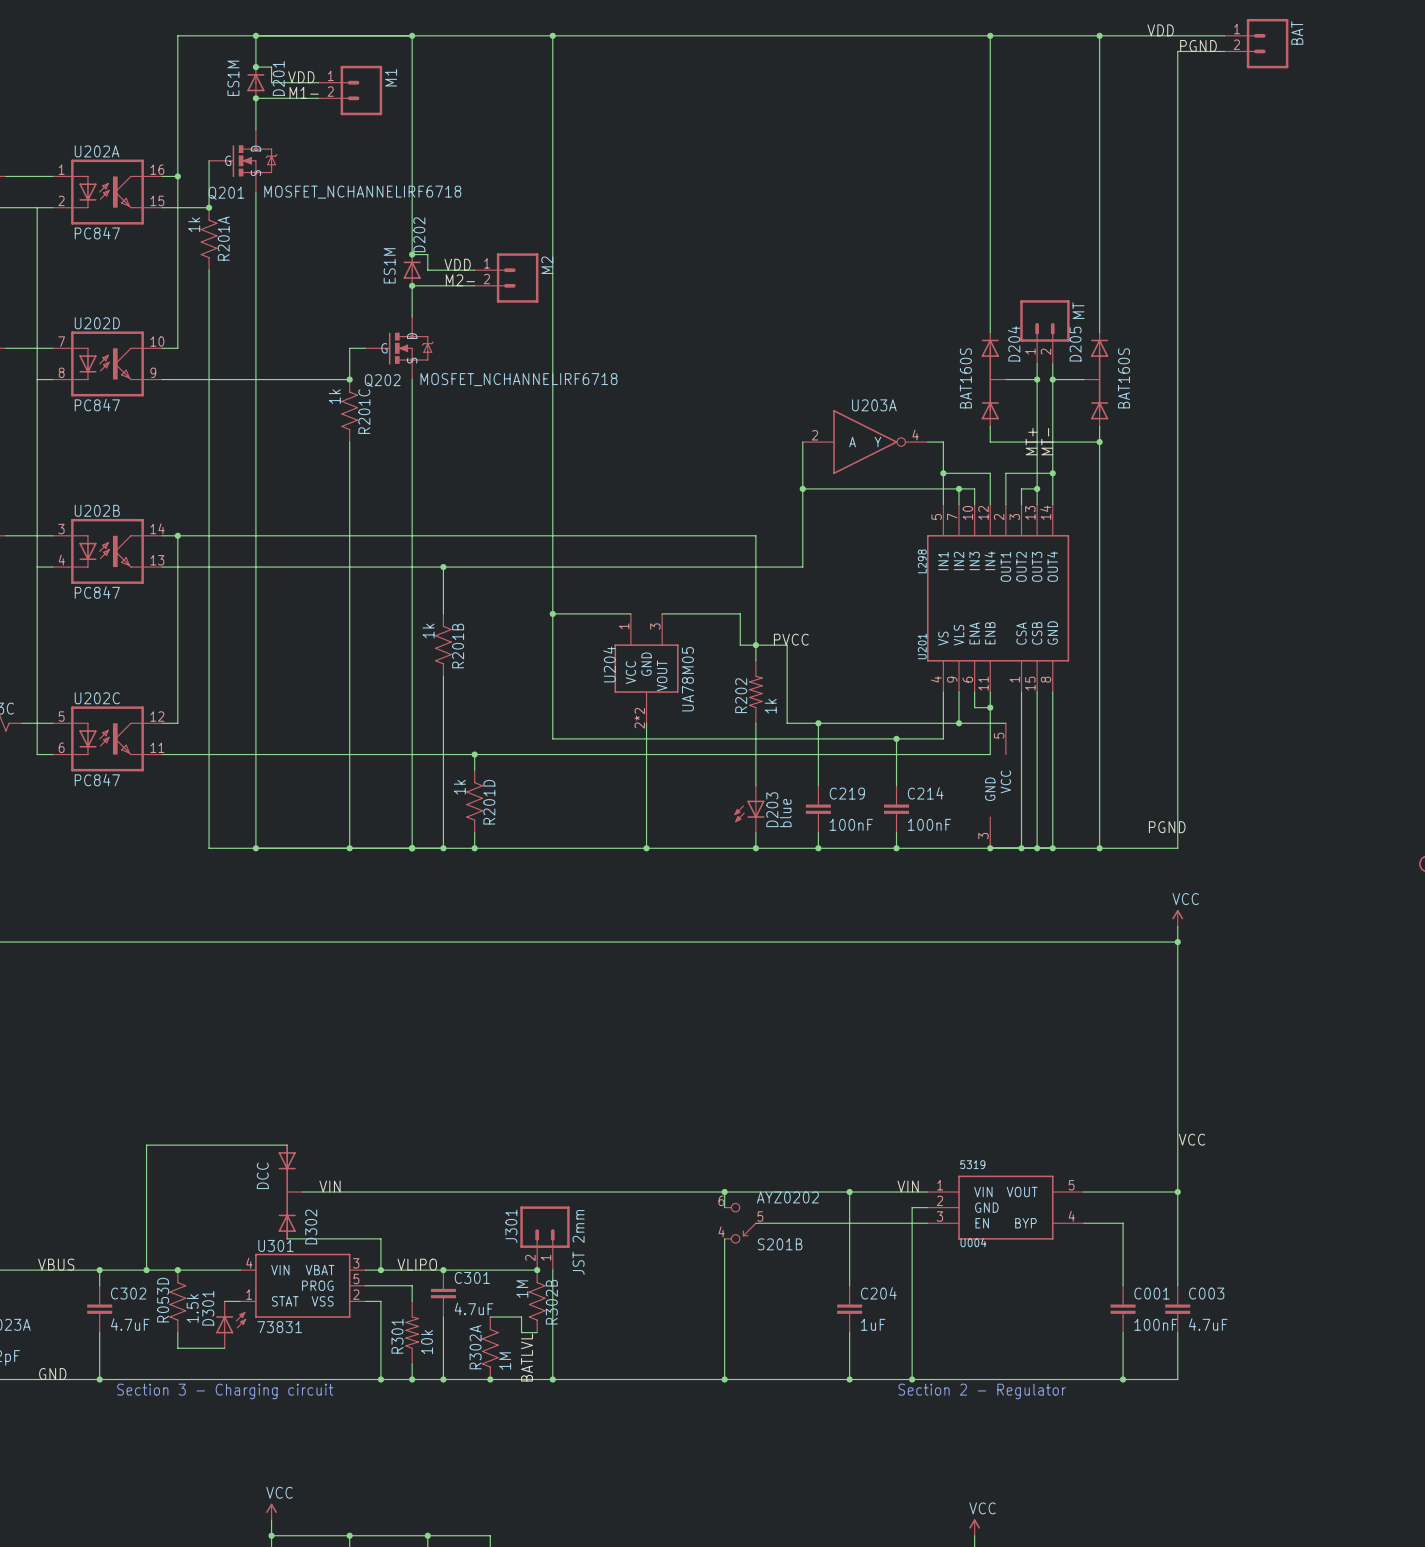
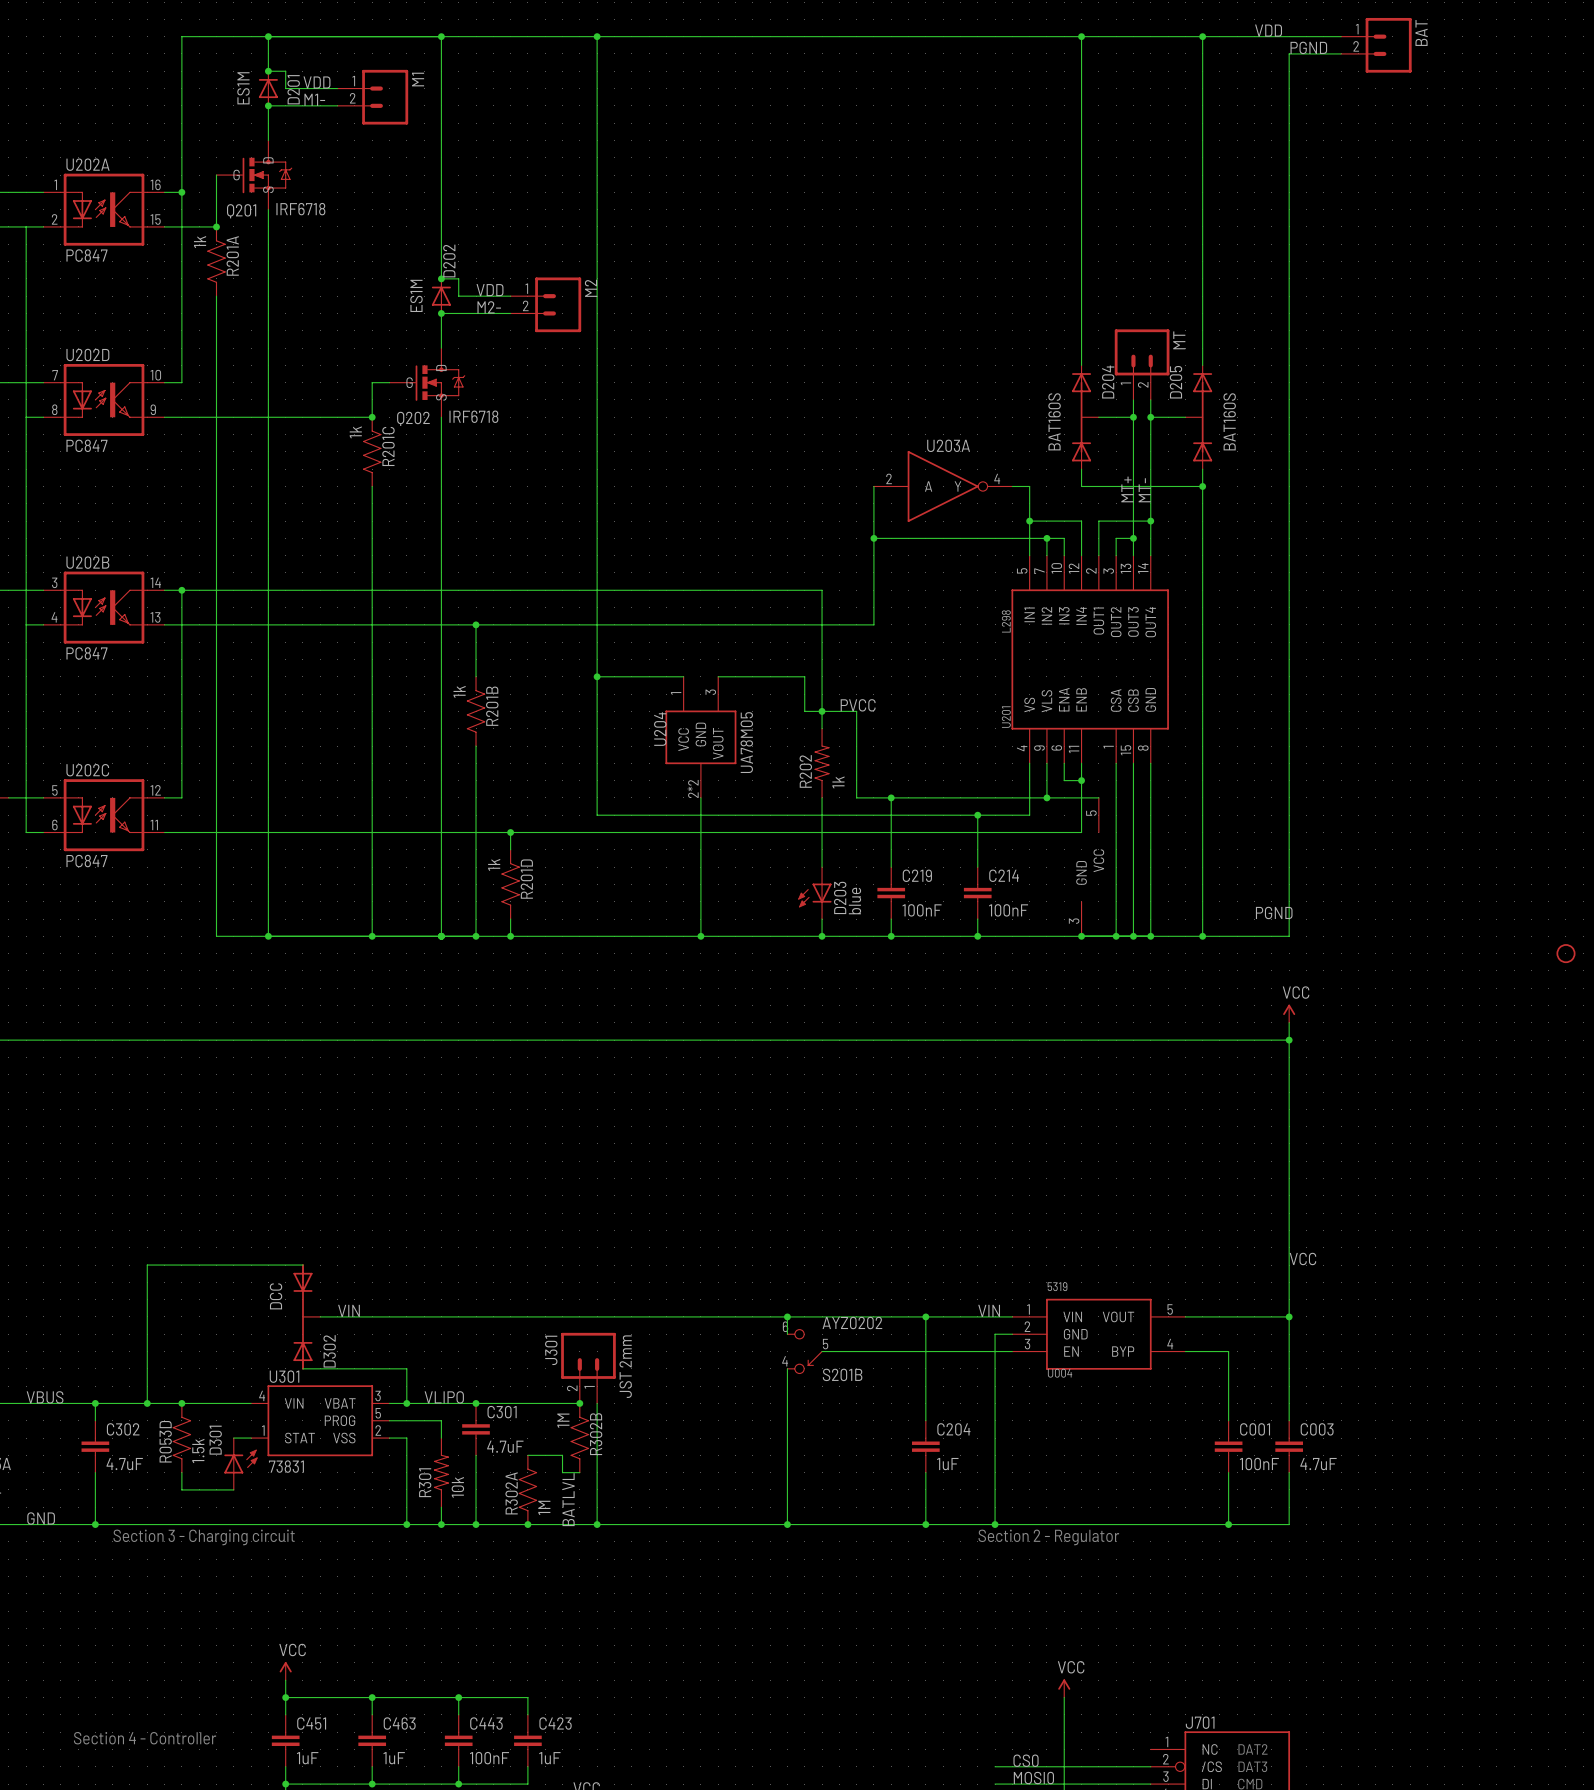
Q201 value: MOSFET_NCHANNELIRF6718 (362, 192) -> IRF6718 (300, 209)
Q202 value: MOSFET_NCHANNELIRF6718 (518, 379) -> IRF6718 (473, 416)

